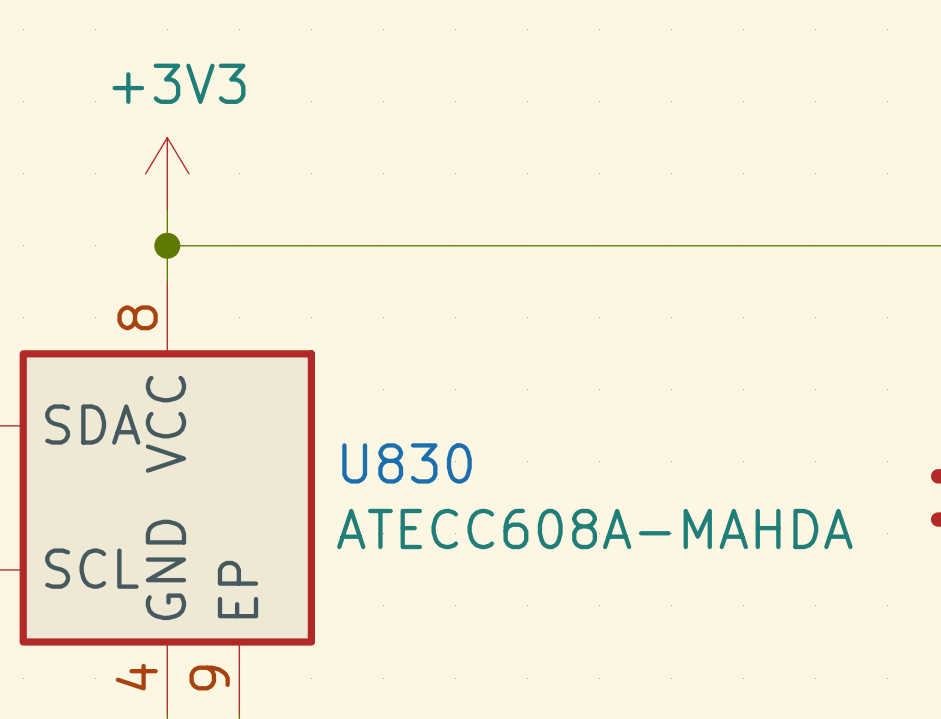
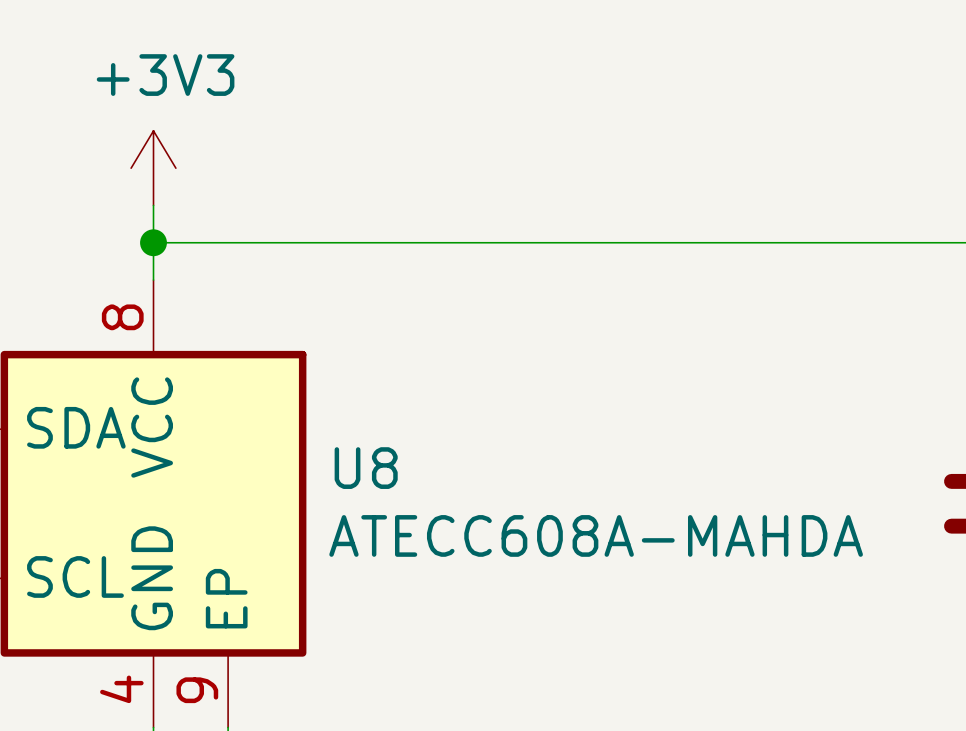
U830 name: U830 (407, 463) -> U8 (366, 468)

